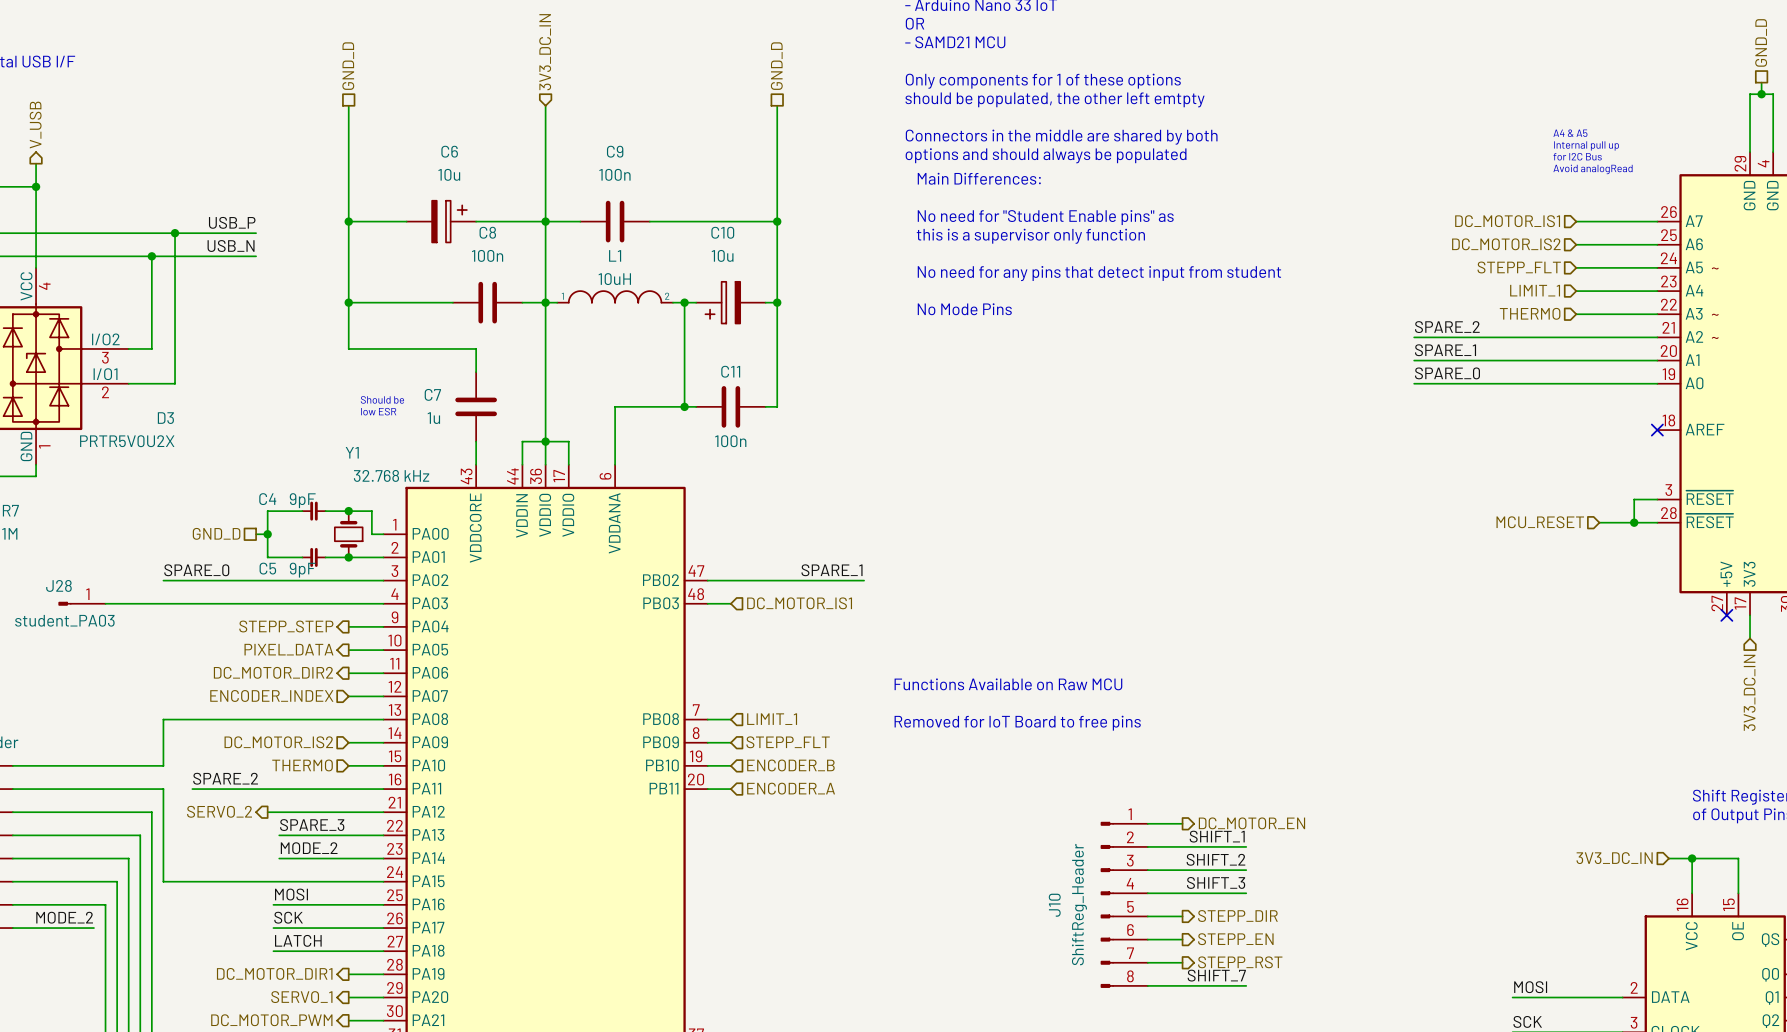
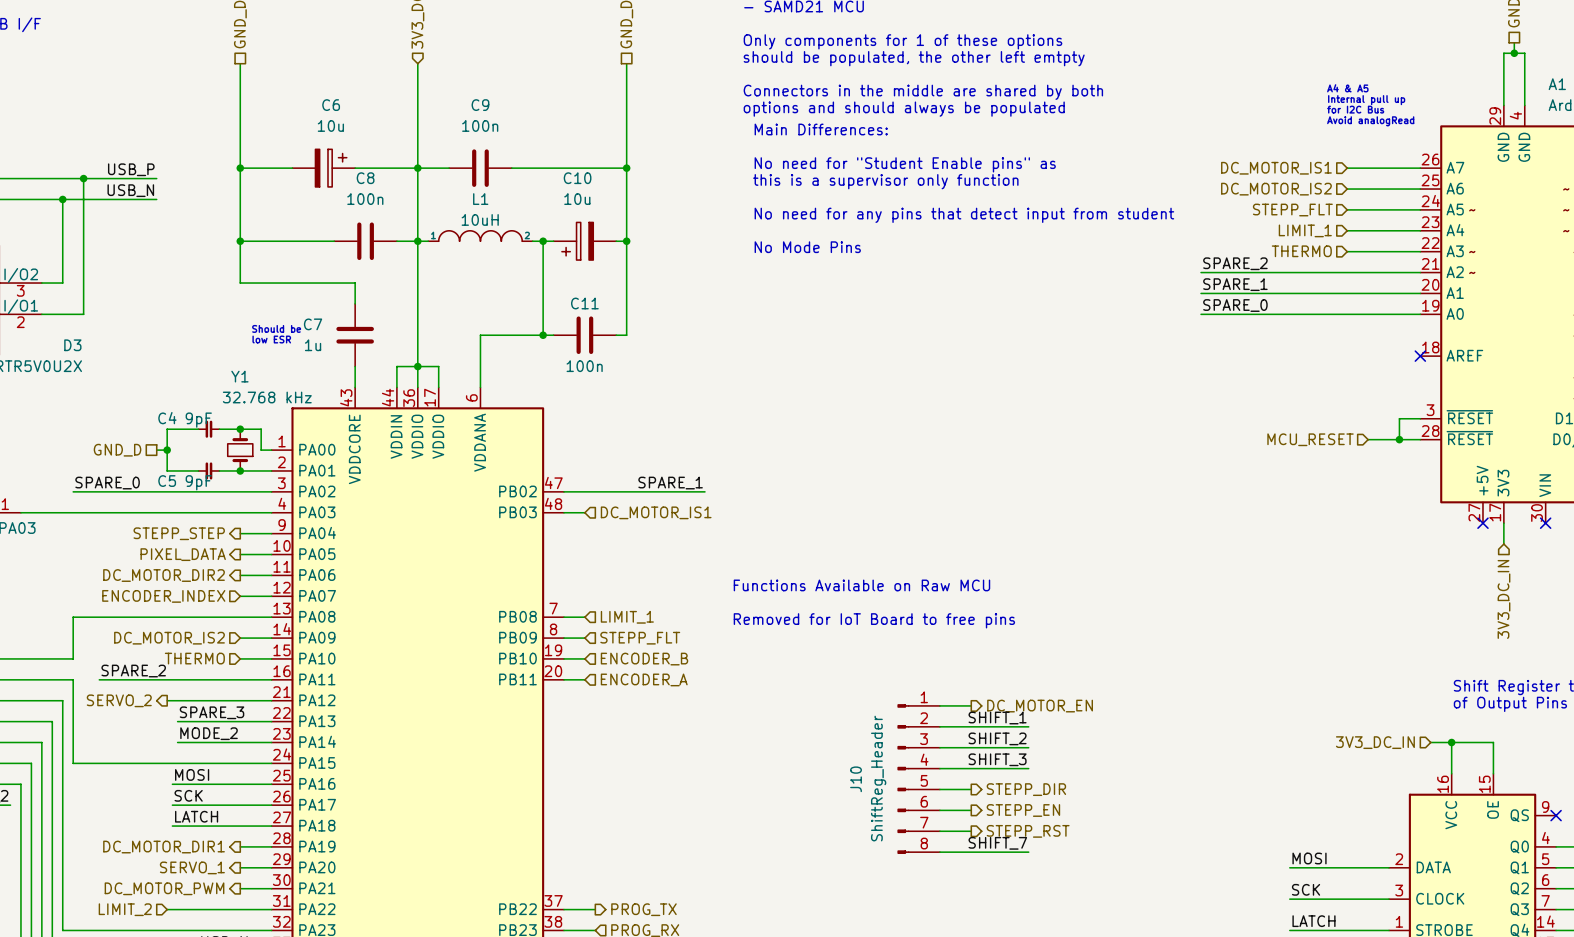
wire: (1147, 823) (1182, 823) -> (939, 705) (971, 705)
hierarchical label position: DC_MOTOR_EN (1251, 823) -> DC_MOTOR_EN (1040, 706)
label position: SHIFT_1 (1217, 836) -> SHIFT_1 (997, 718)
wire: (1147, 846) (1246, 846) -> (939, 726) (1028, 726)
label position: SHIFT_2 (1215, 859) -> SHIFT_2 (997, 738)
wire: (1147, 870) (1246, 870) -> (939, 747) (1028, 747)
label position: SHIFT_3 (1216, 882) -> SHIFT_3 (997, 759)
wire: (1147, 893) (1246, 893) -> (939, 768) (1028, 768)
J10 position: (1124, 904) -> (918, 779)
wire: (1147, 916) (1182, 916) -> (939, 789) (971, 789)
hierarchical label position: STEPP_DIR (1237, 916) -> STEPP_DIR (1026, 789)
wire: (1147, 939) (1182, 939) -> (939, 810) (971, 810)
hierarchical label position: STEPP_EN (1235, 939) -> STEPP_EN (1023, 810)
wire: (1147, 962) (1182, 962) -> (939, 831) (971, 831)
hierarchical label position: STEPP_RST (1240, 962) -> STEPP_RST (1028, 831)
label position: SHIFT_7 (1216, 975) -> SHIFT_7 (997, 843)
wire: (1147, 985) (1246, 985) -> (939, 852) (1028, 852)

